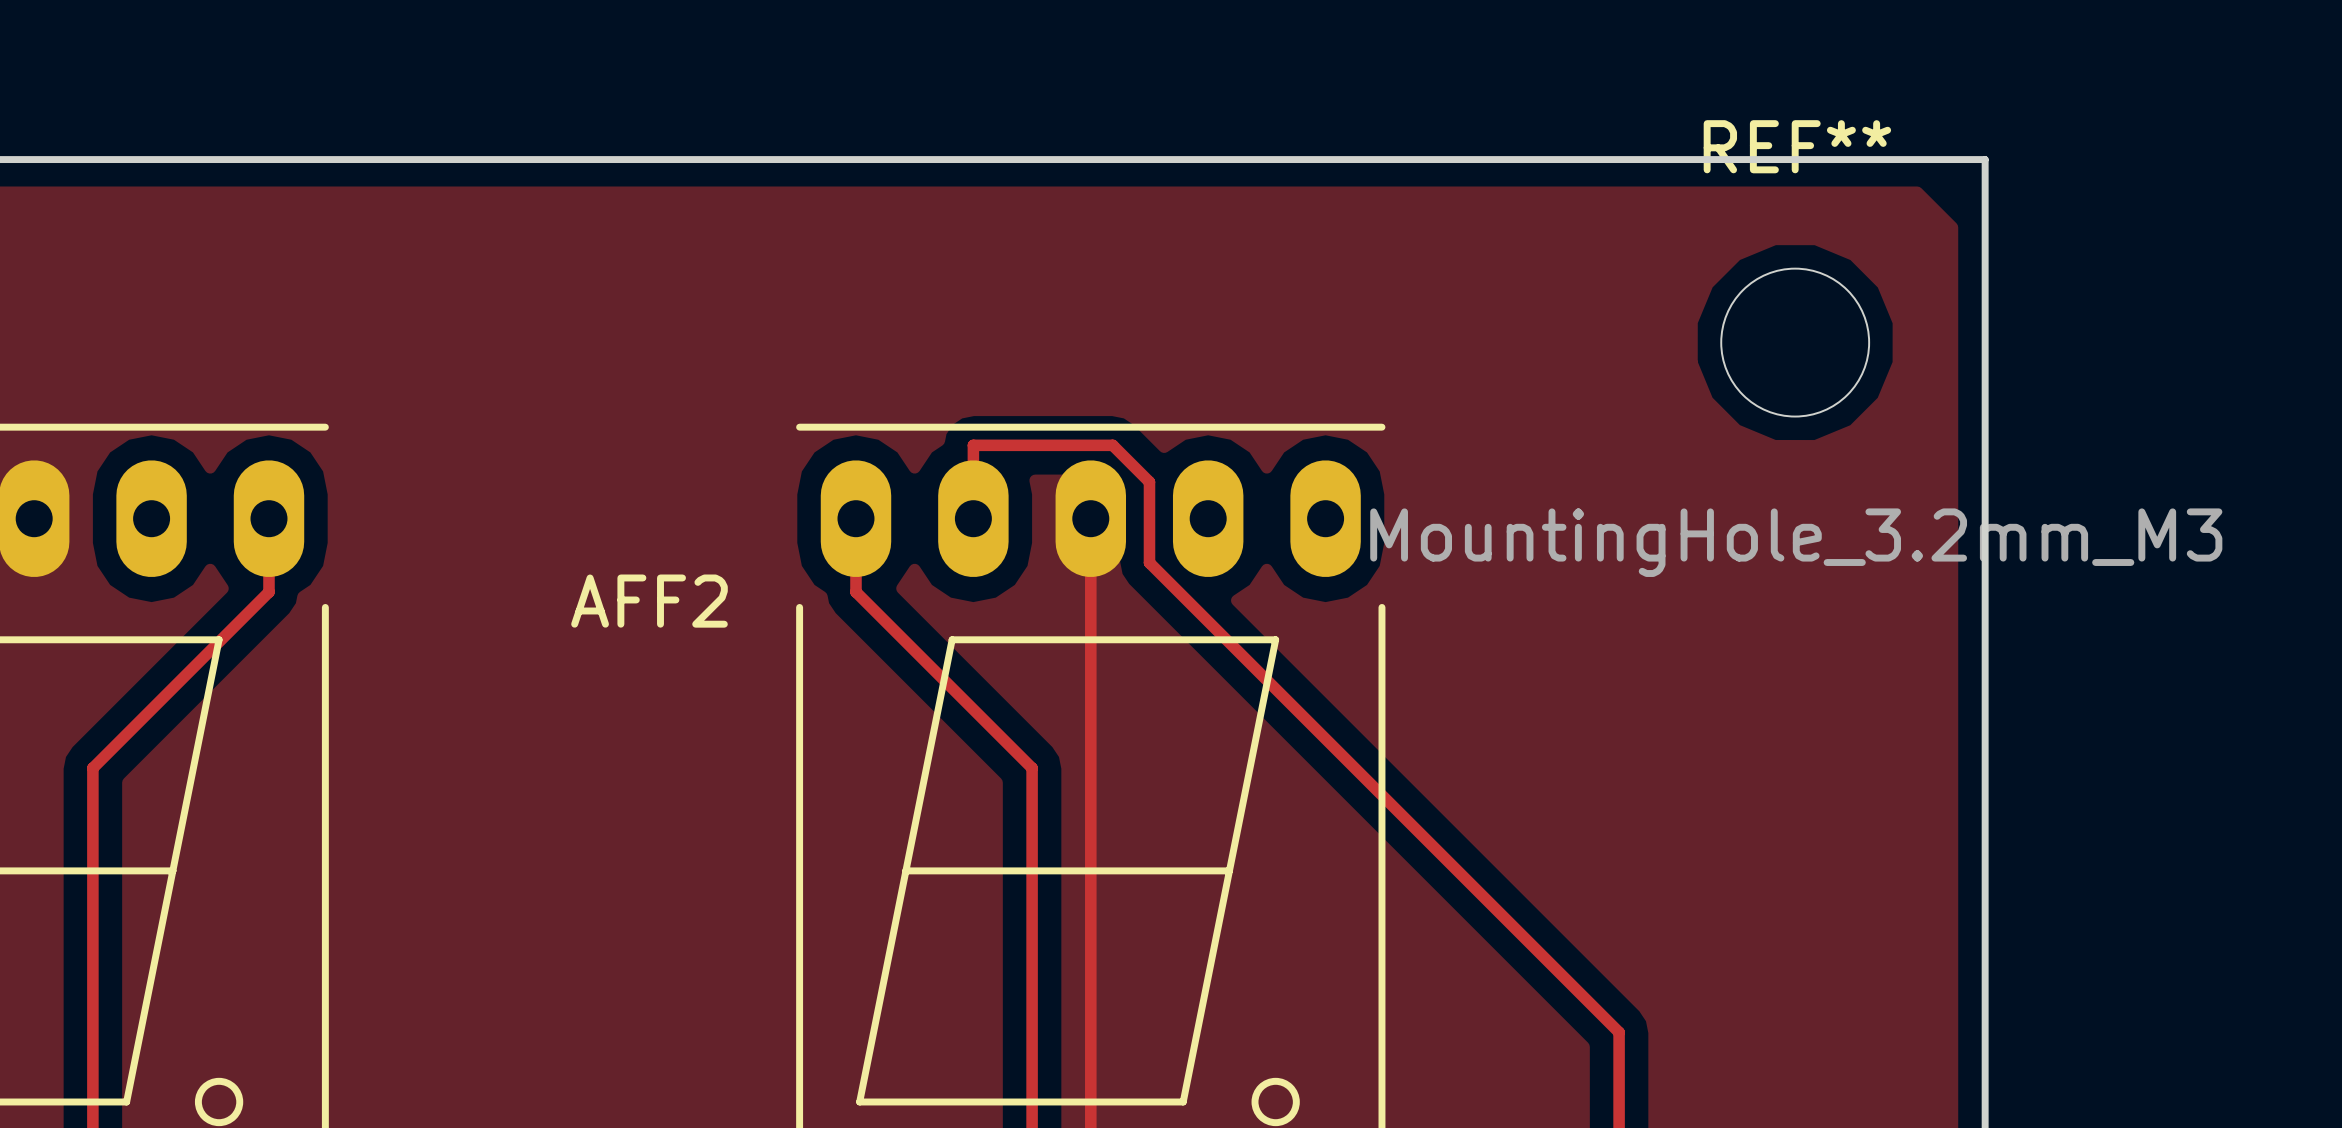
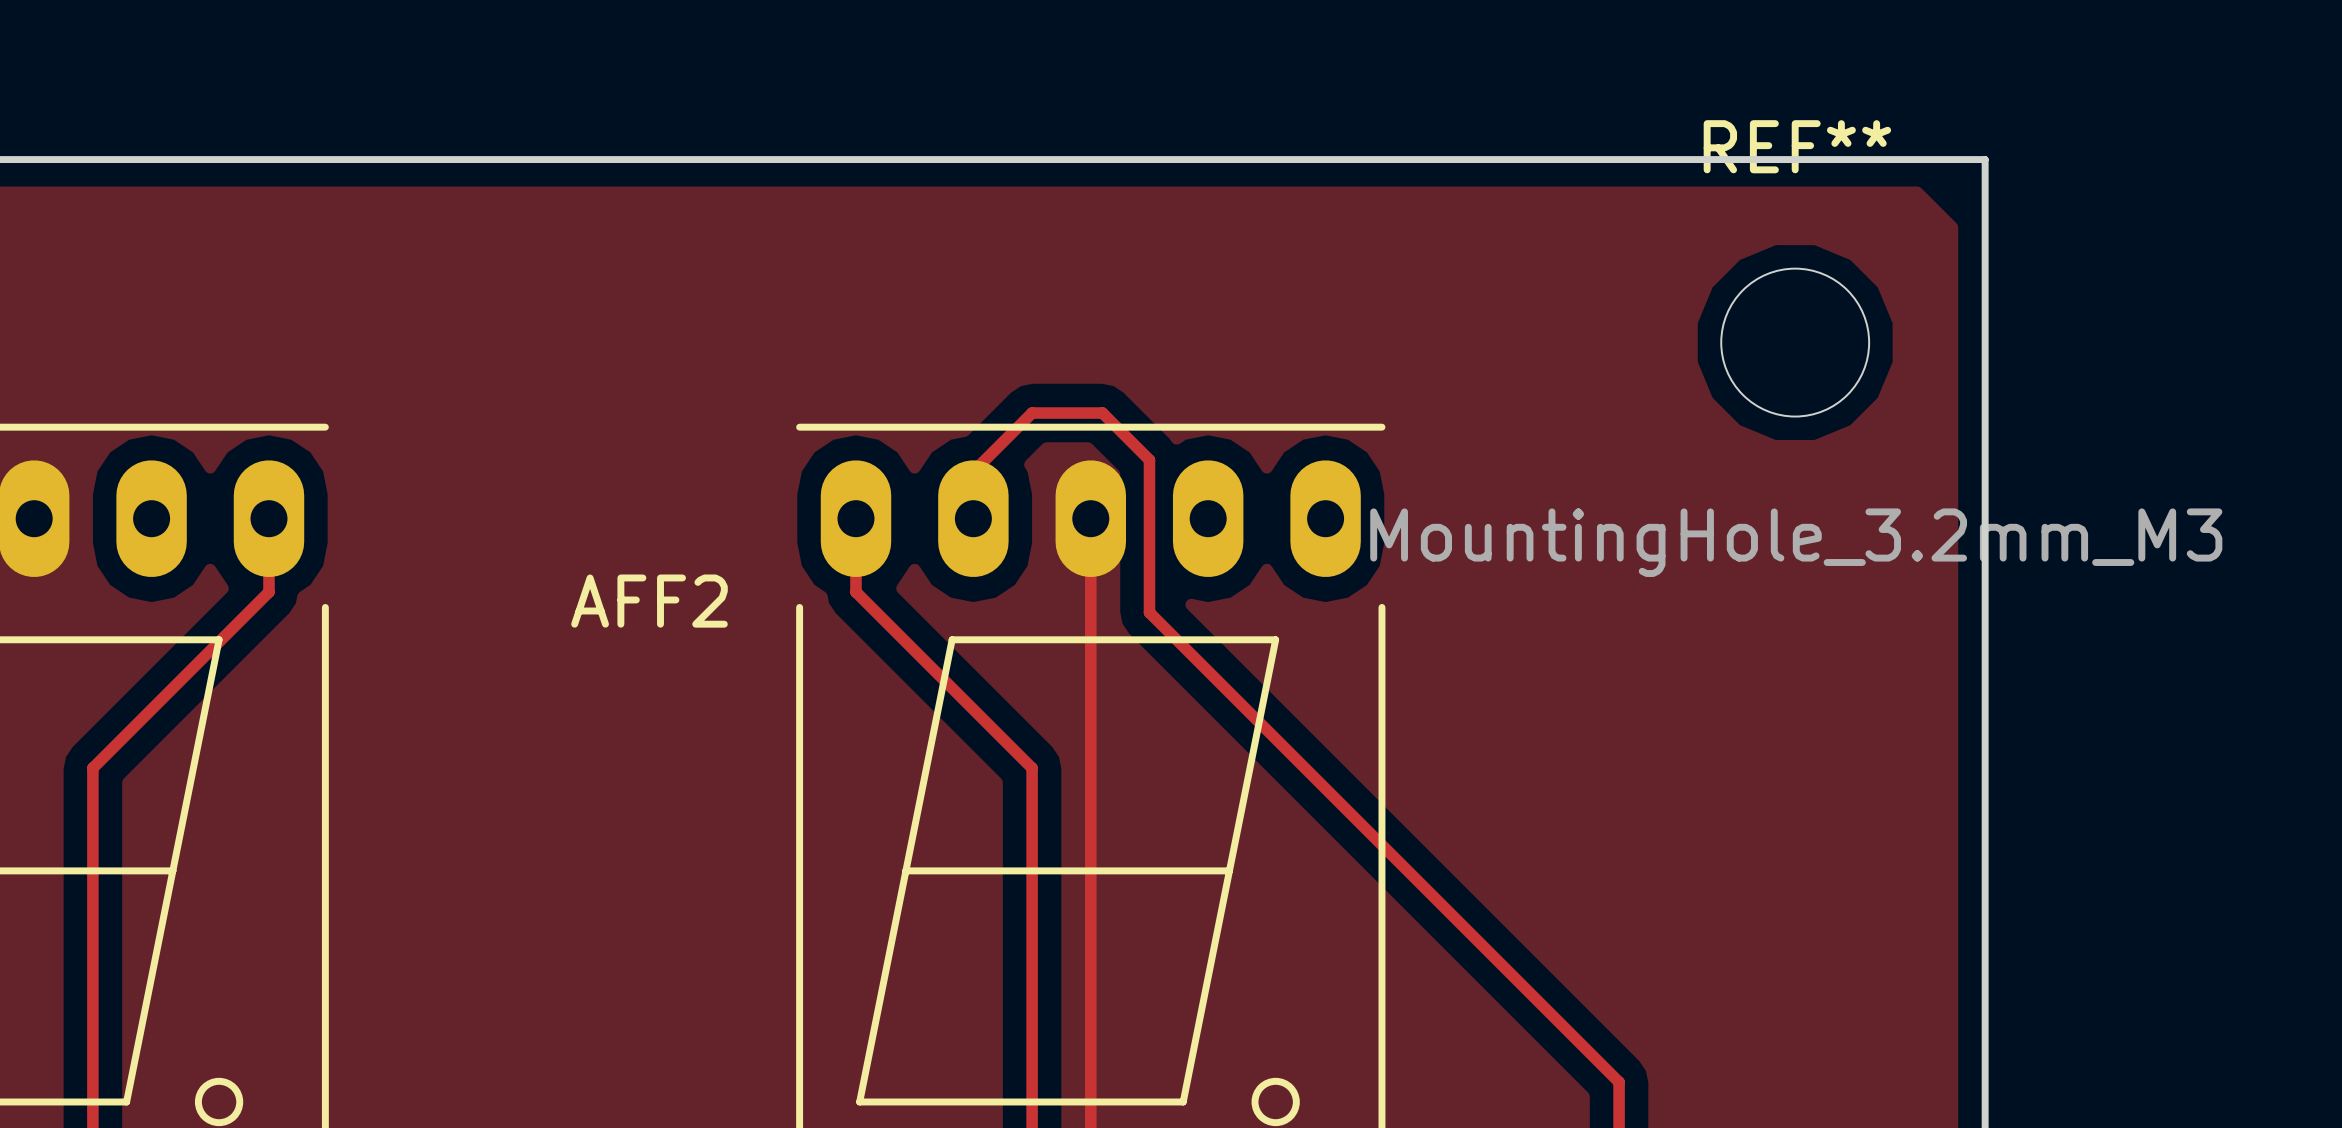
track: (973, 471) (973, 445) (1112, 445) (1149, 482) -> (973, 471) (1032, 413) (1102, 413) (1149, 459) (1149, 482)
track: (1149, 562) (1619, 1032) (1619, 1082) -> (1149, 562) (1149, 612) (1619, 1082)

